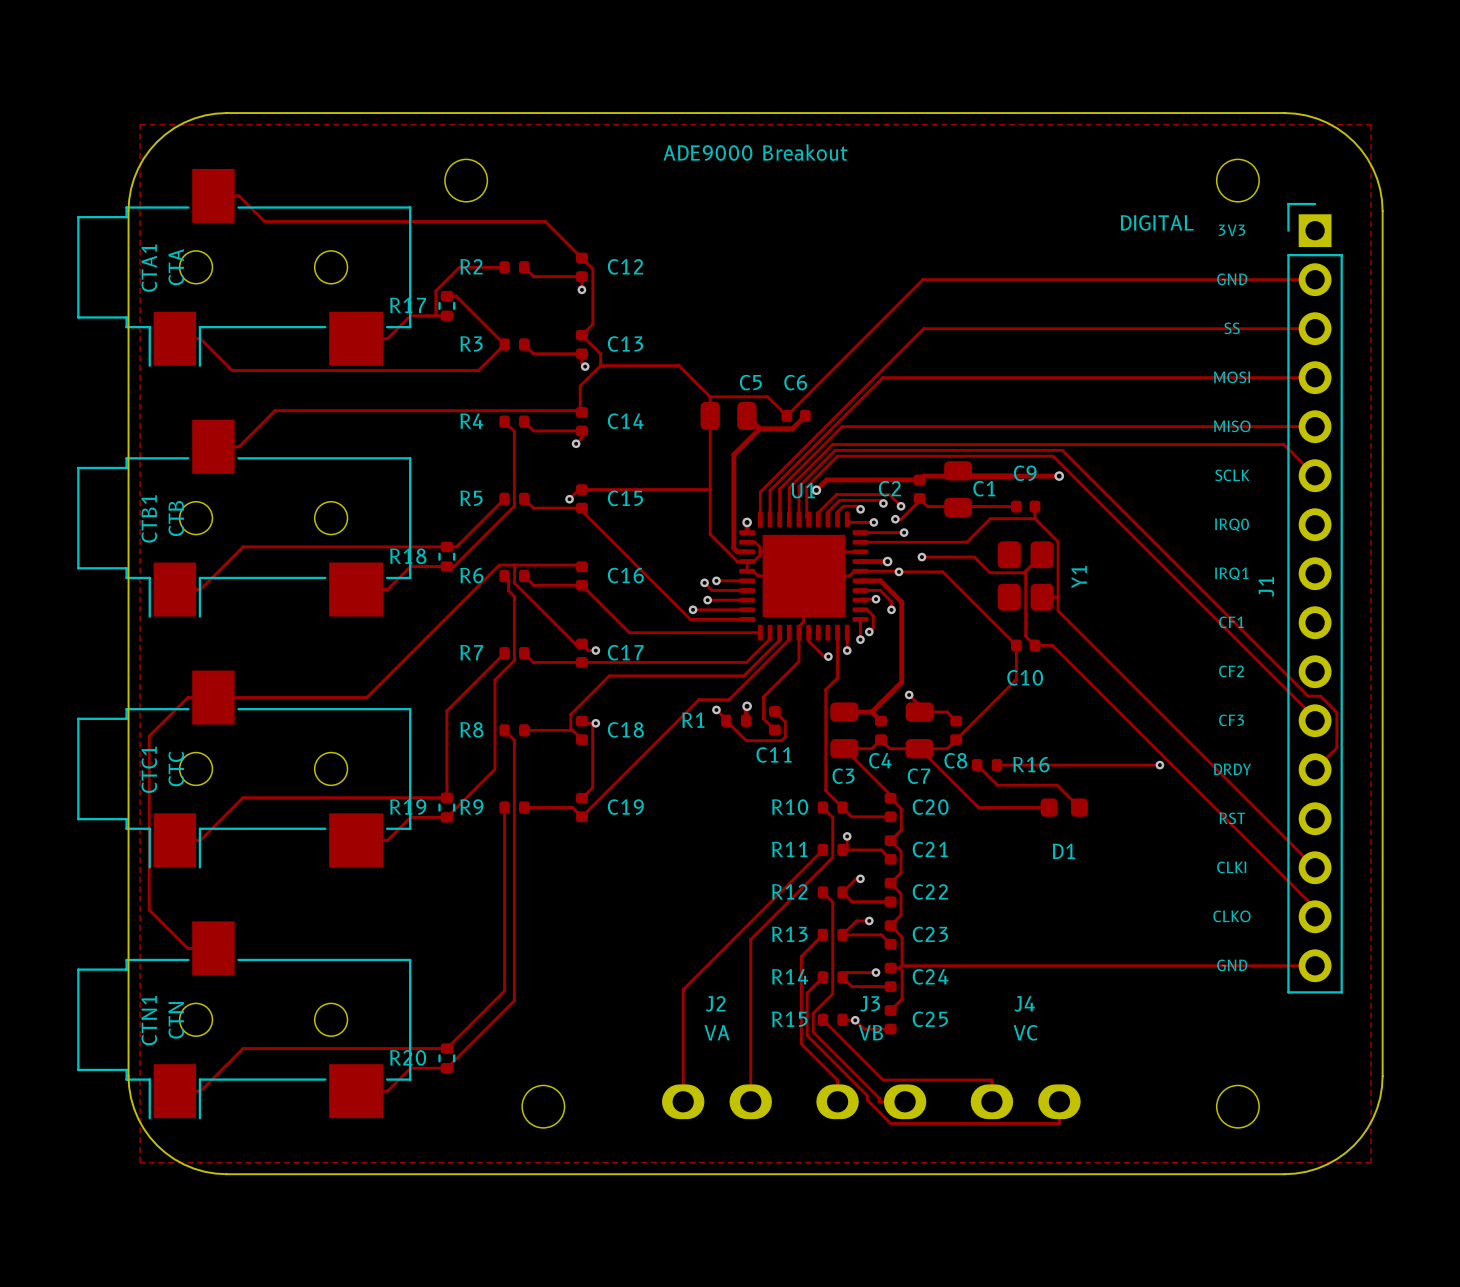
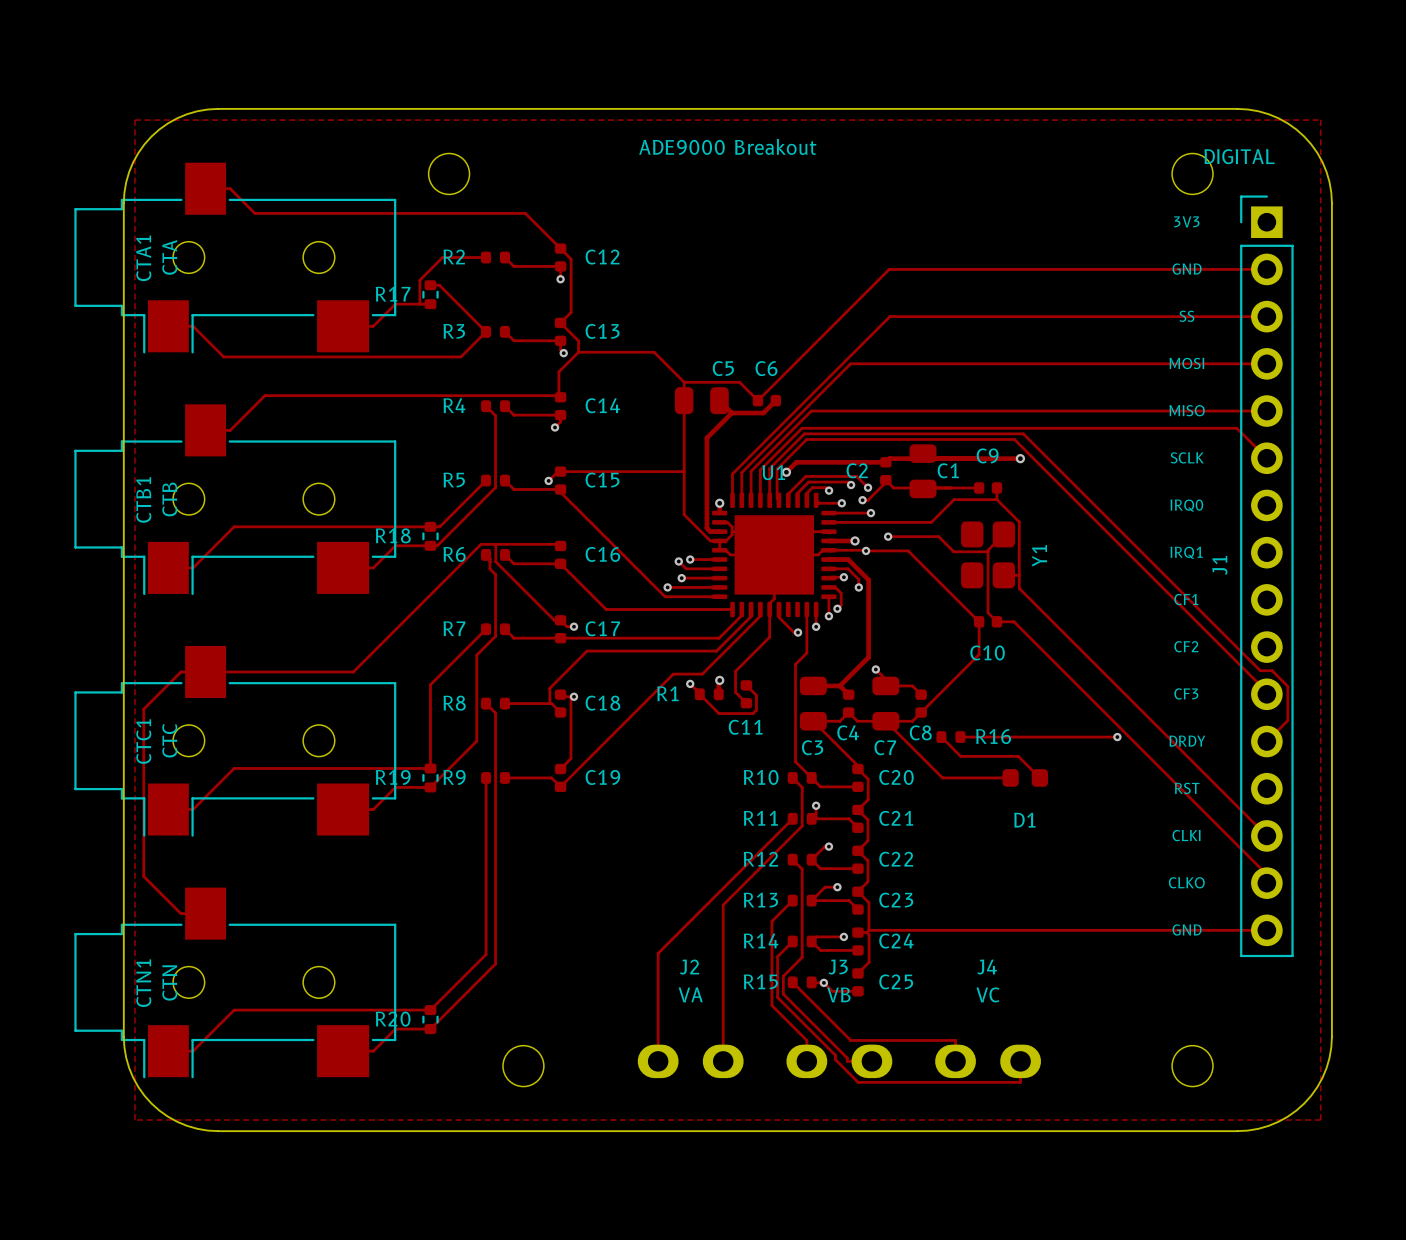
text position: DIGITAL (1157, 222) -> DIGITAL (1239, 156)

